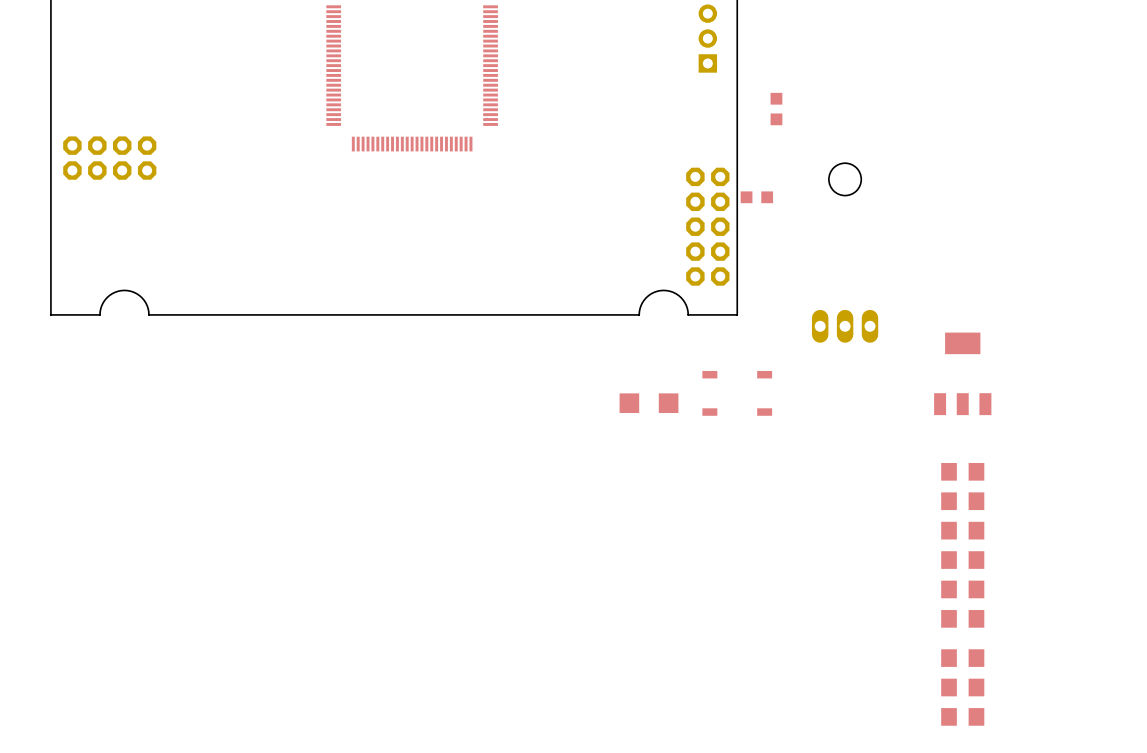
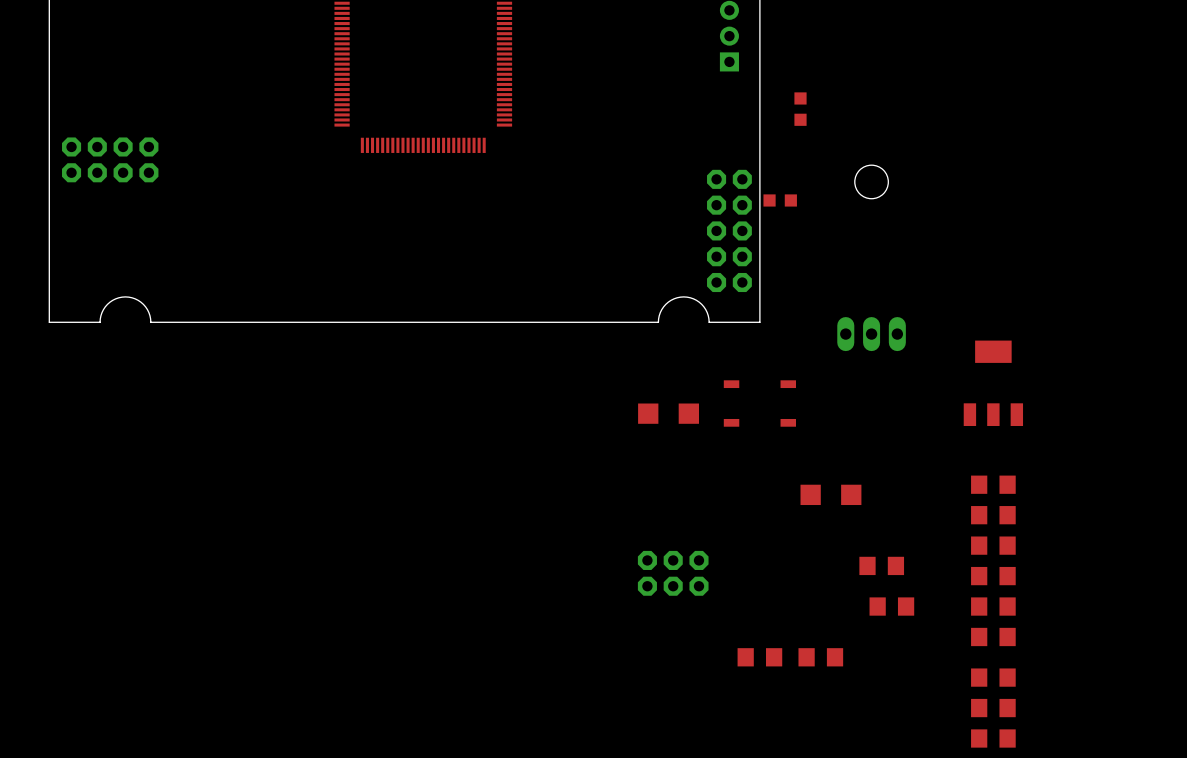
part: none -> (830, 494)
part: none -> (881, 565)
part: none -> (673, 573)
part: none -> (891, 606)
part: none -> (759, 657)
part: none -> (820, 657)

